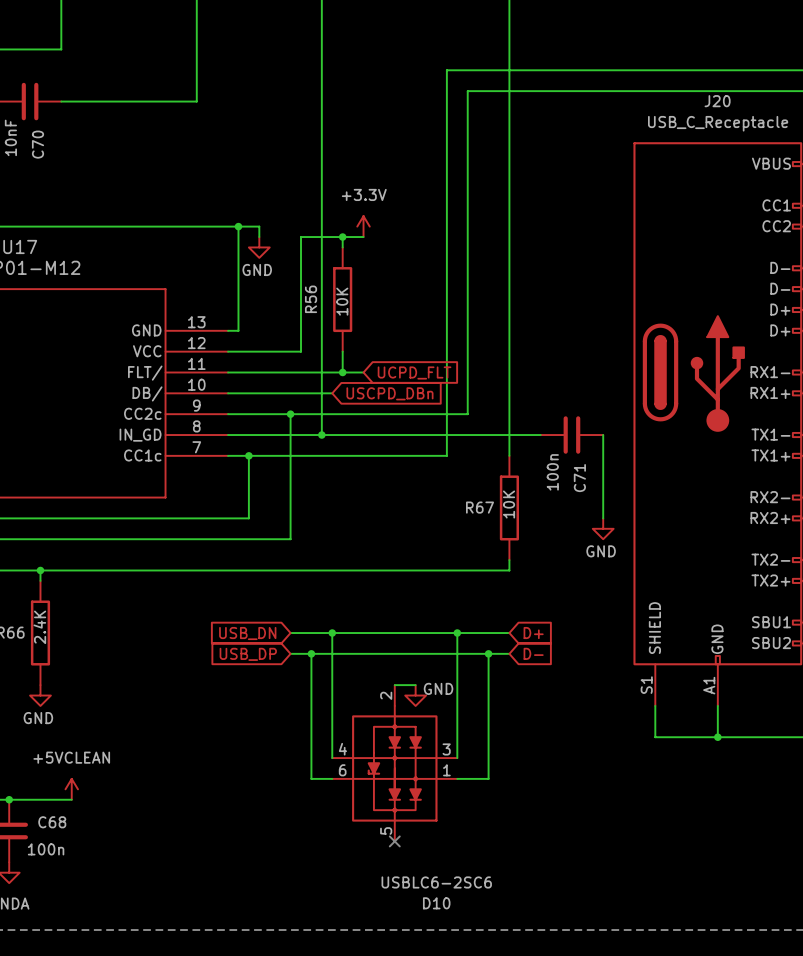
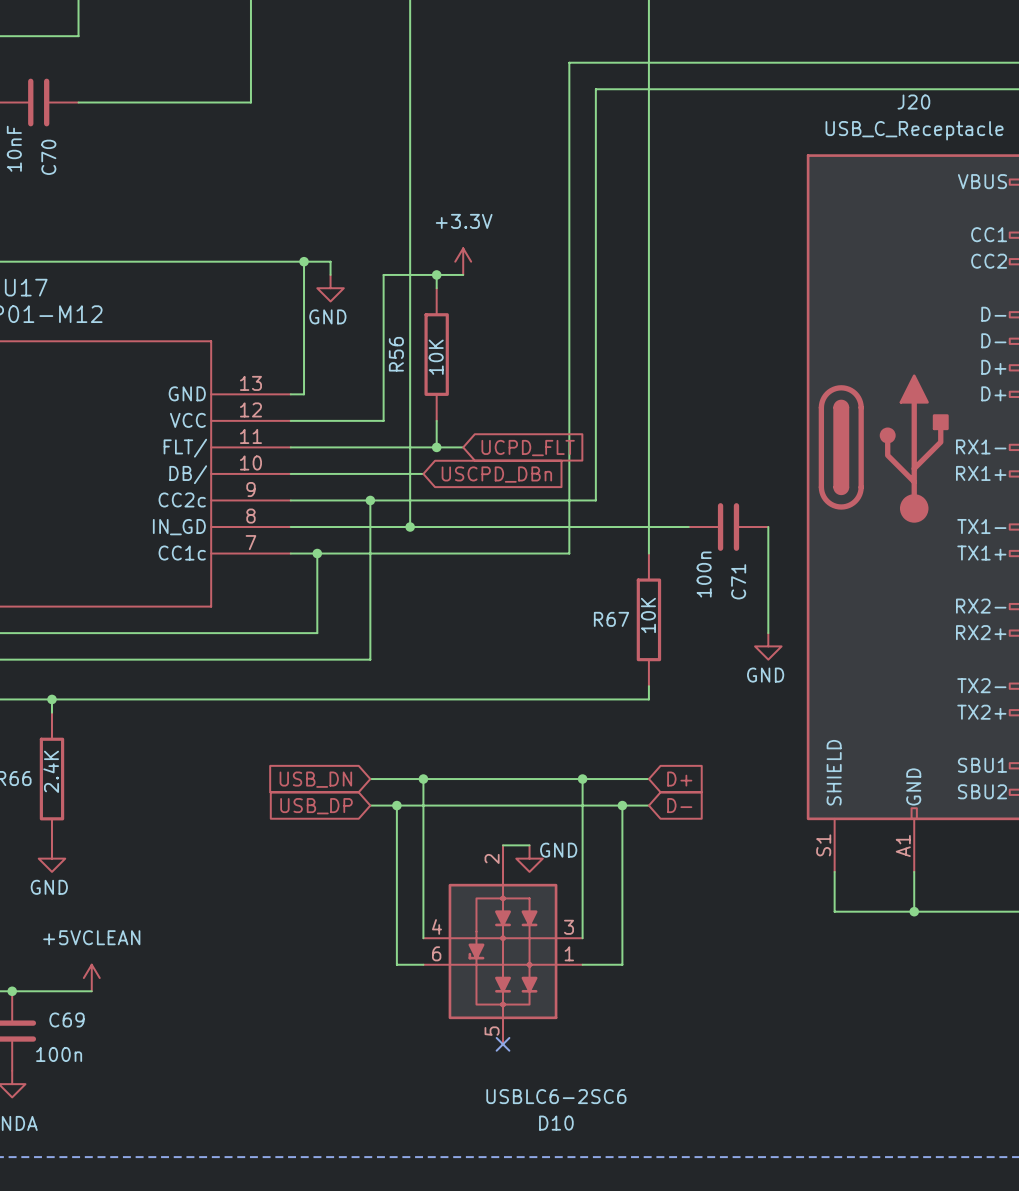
C68 name: C68 (52, 822) -> C69 (67, 1019)

